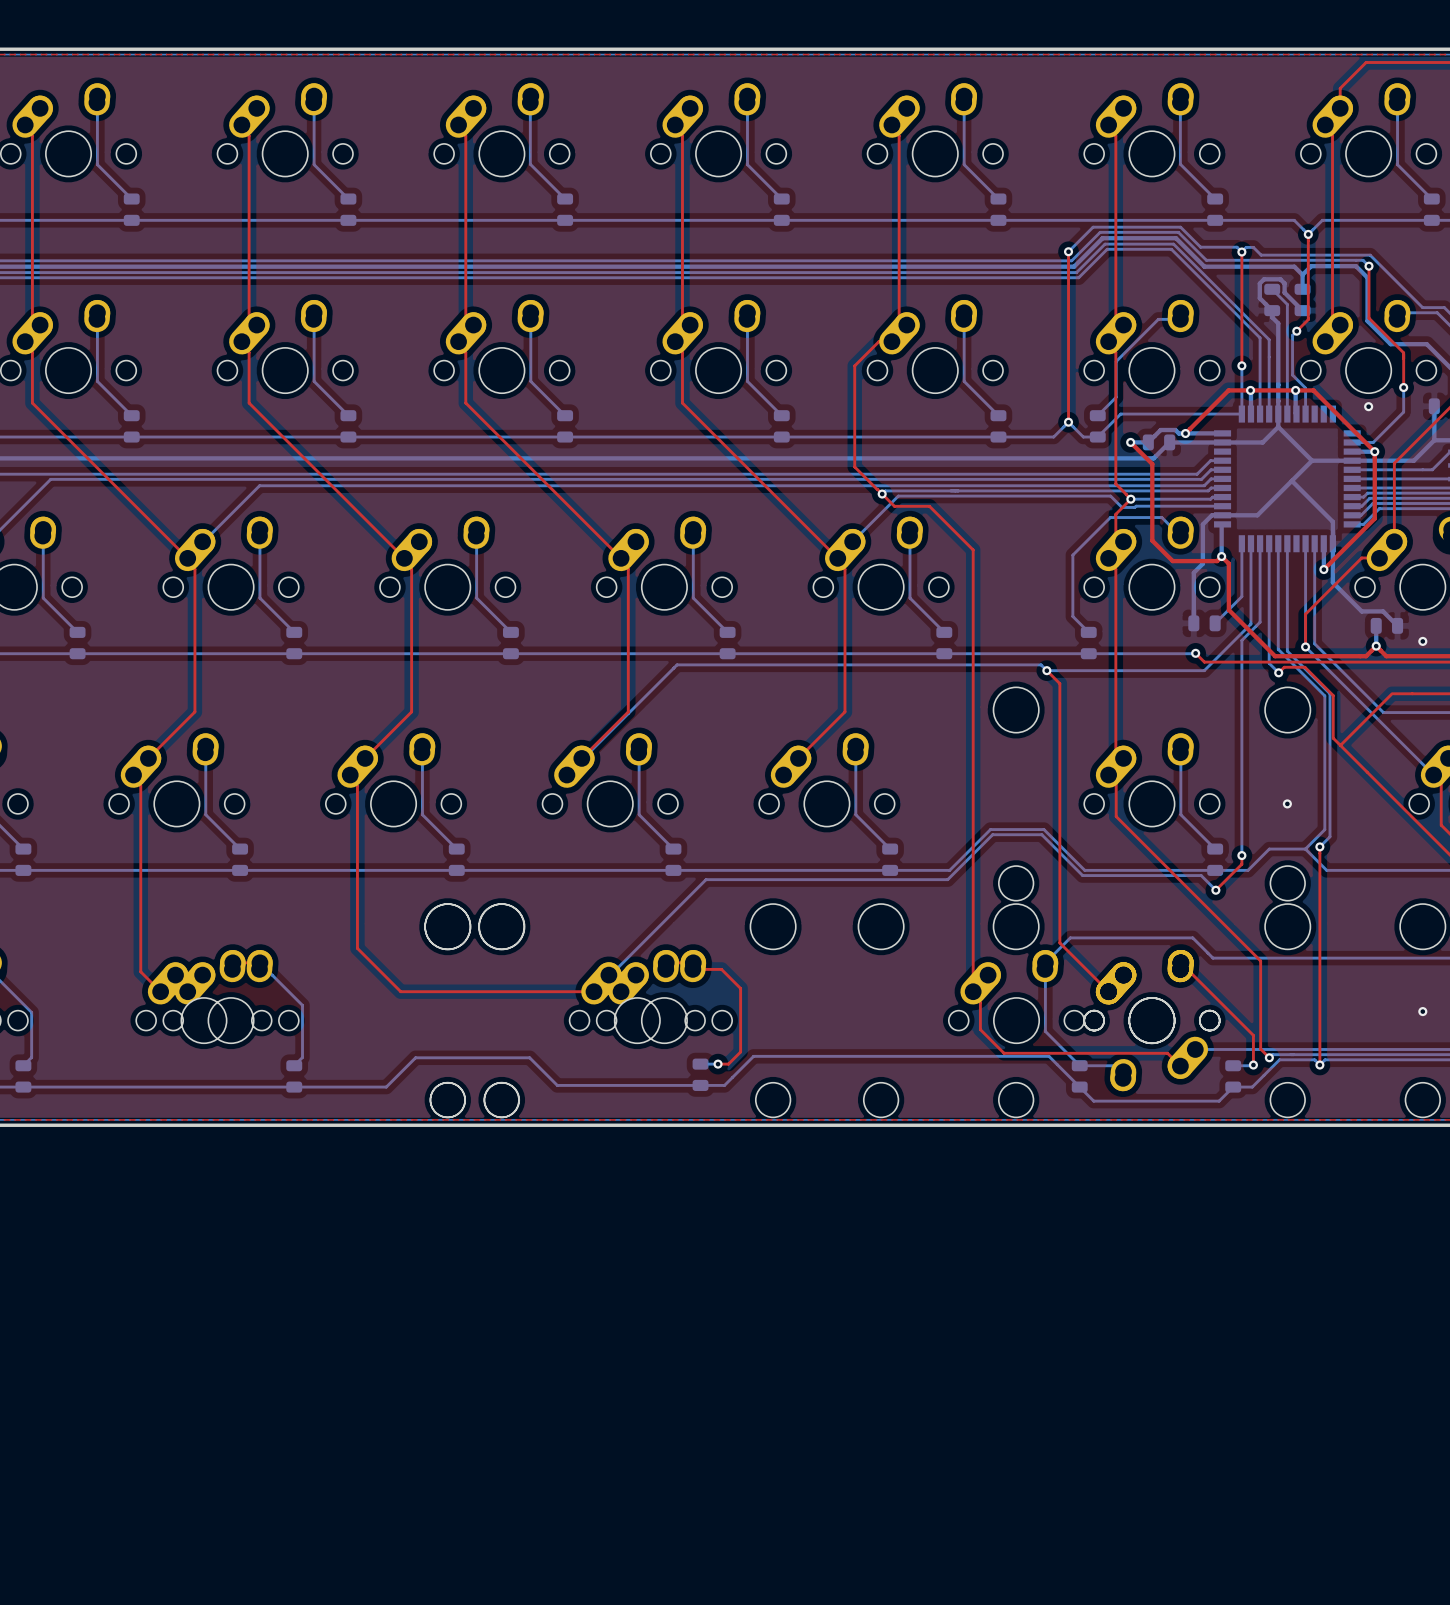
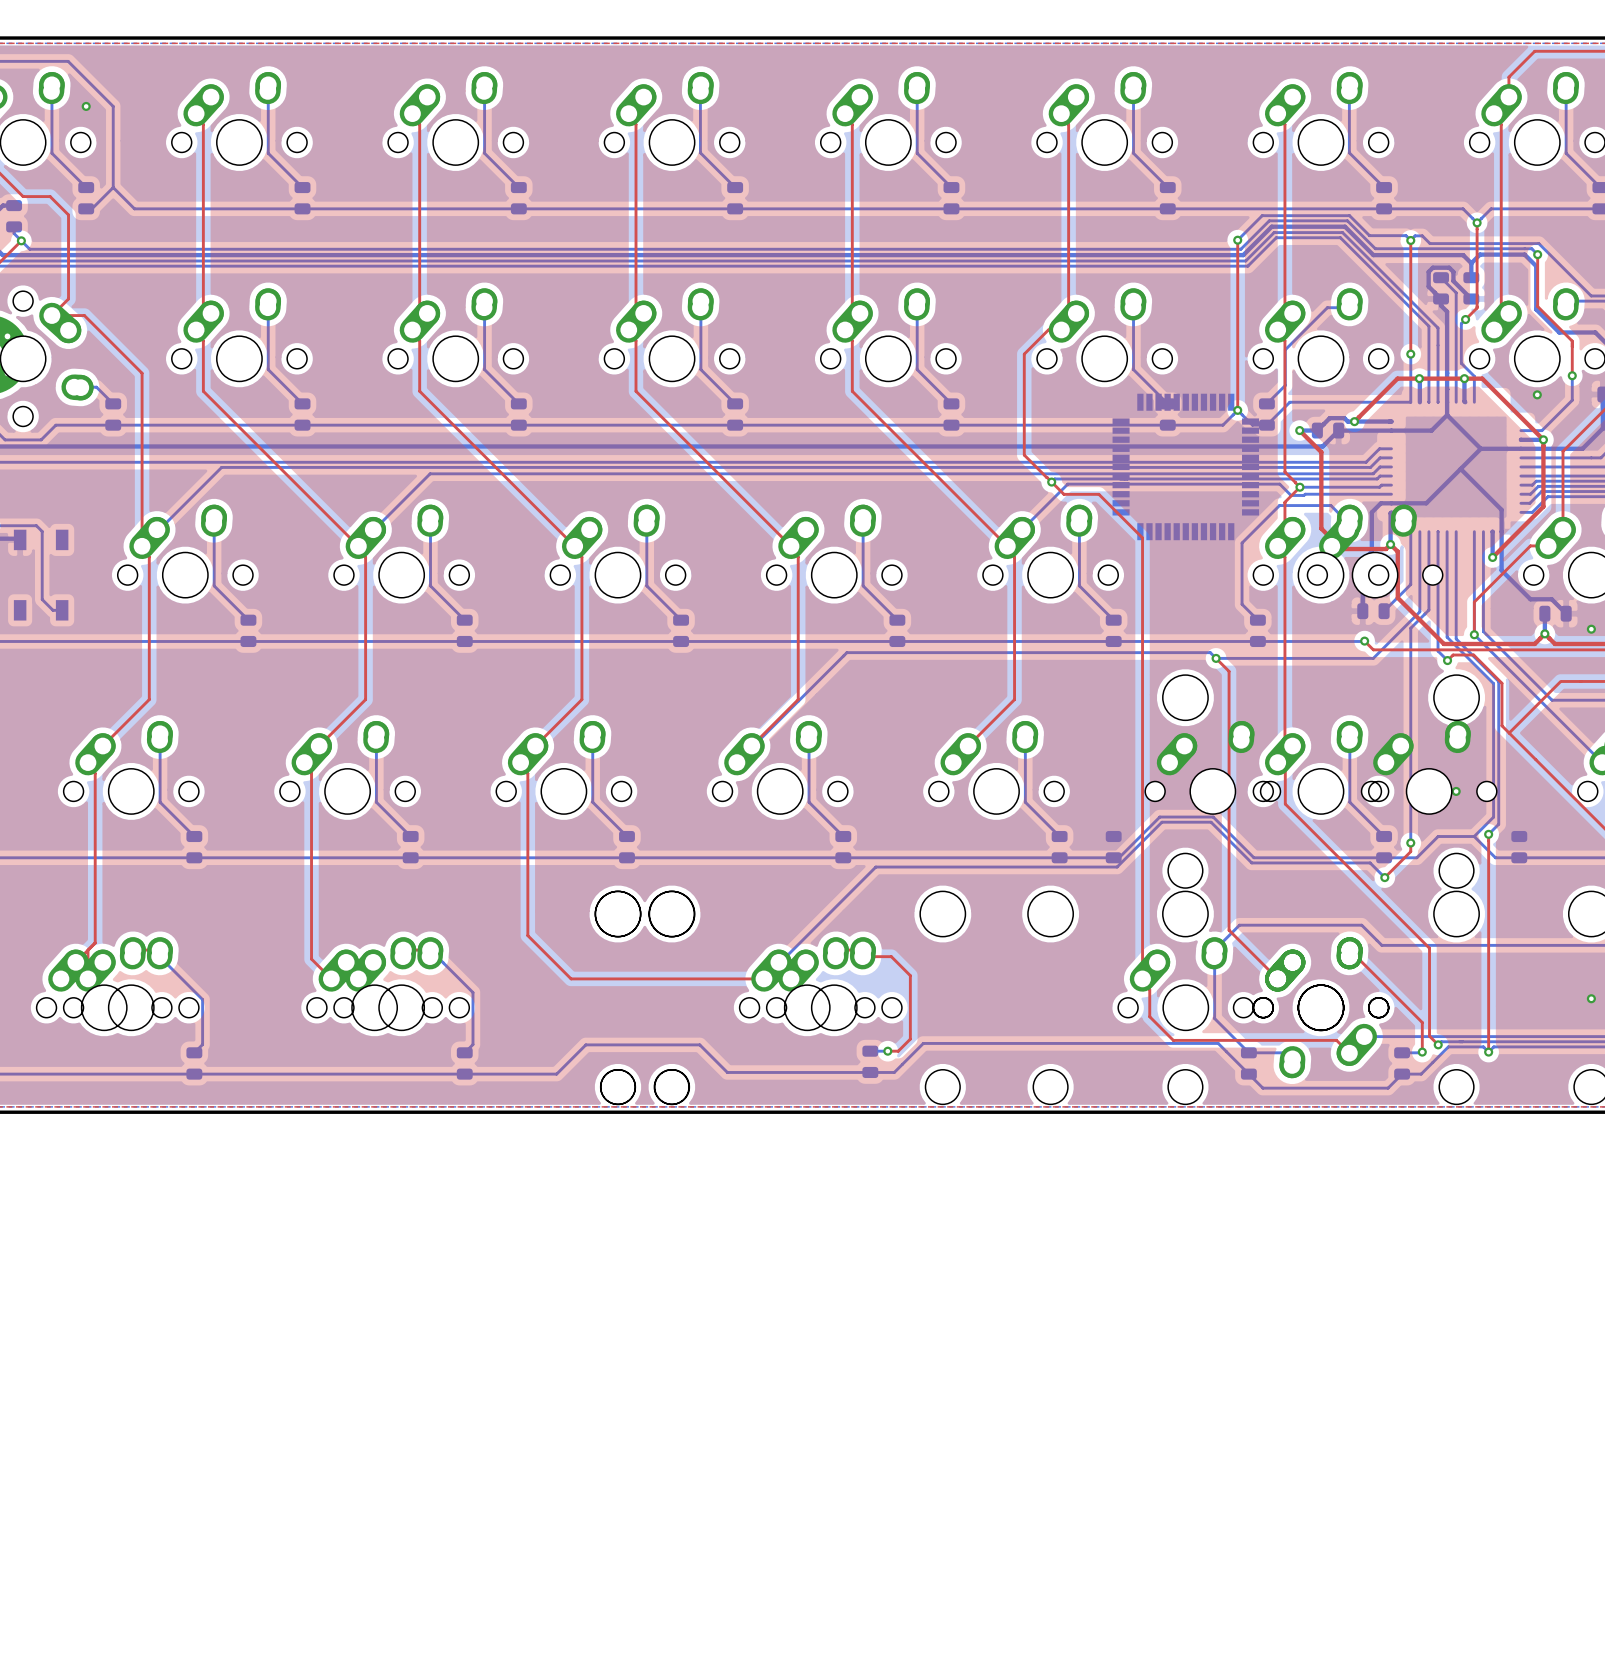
part position: (1287, 478) -> (1185, 466)
part: none -> (1375, 551)
part: none -> (1212, 767)
part: none -> (1429, 767)
part: none -> (1113, 847)
part: none -> (1519, 847)

